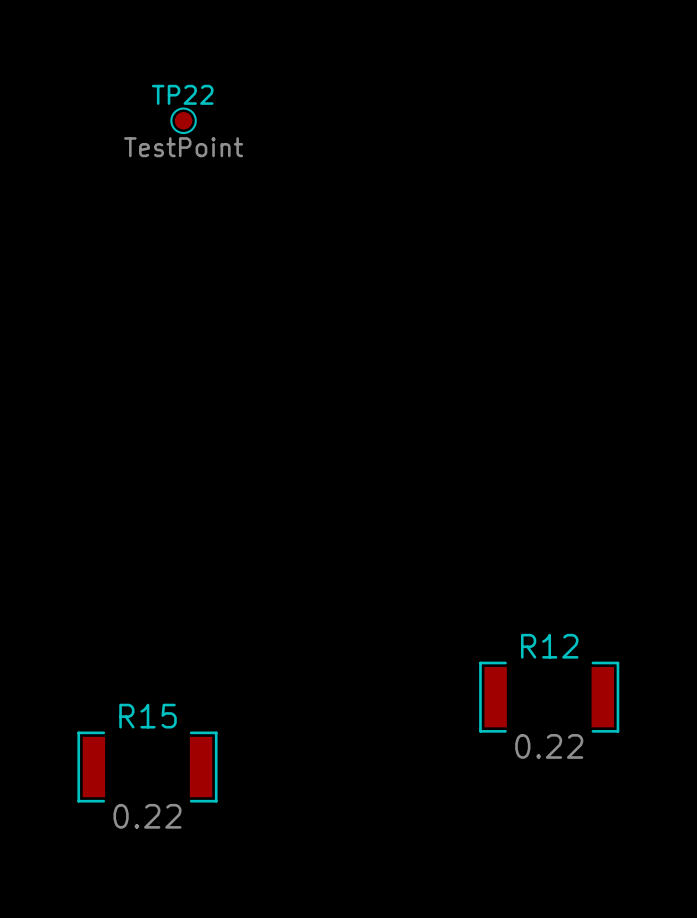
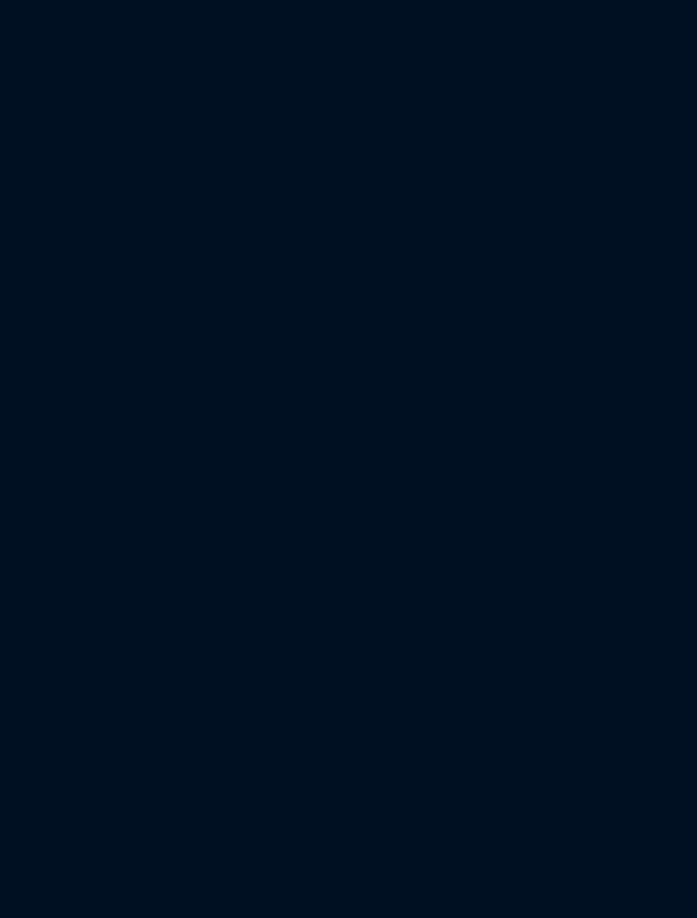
TP22: TestPoint (183, 120) -> none
R12: 0.22 (549, 697) -> none
R15: 0.22 (147, 767) -> none

